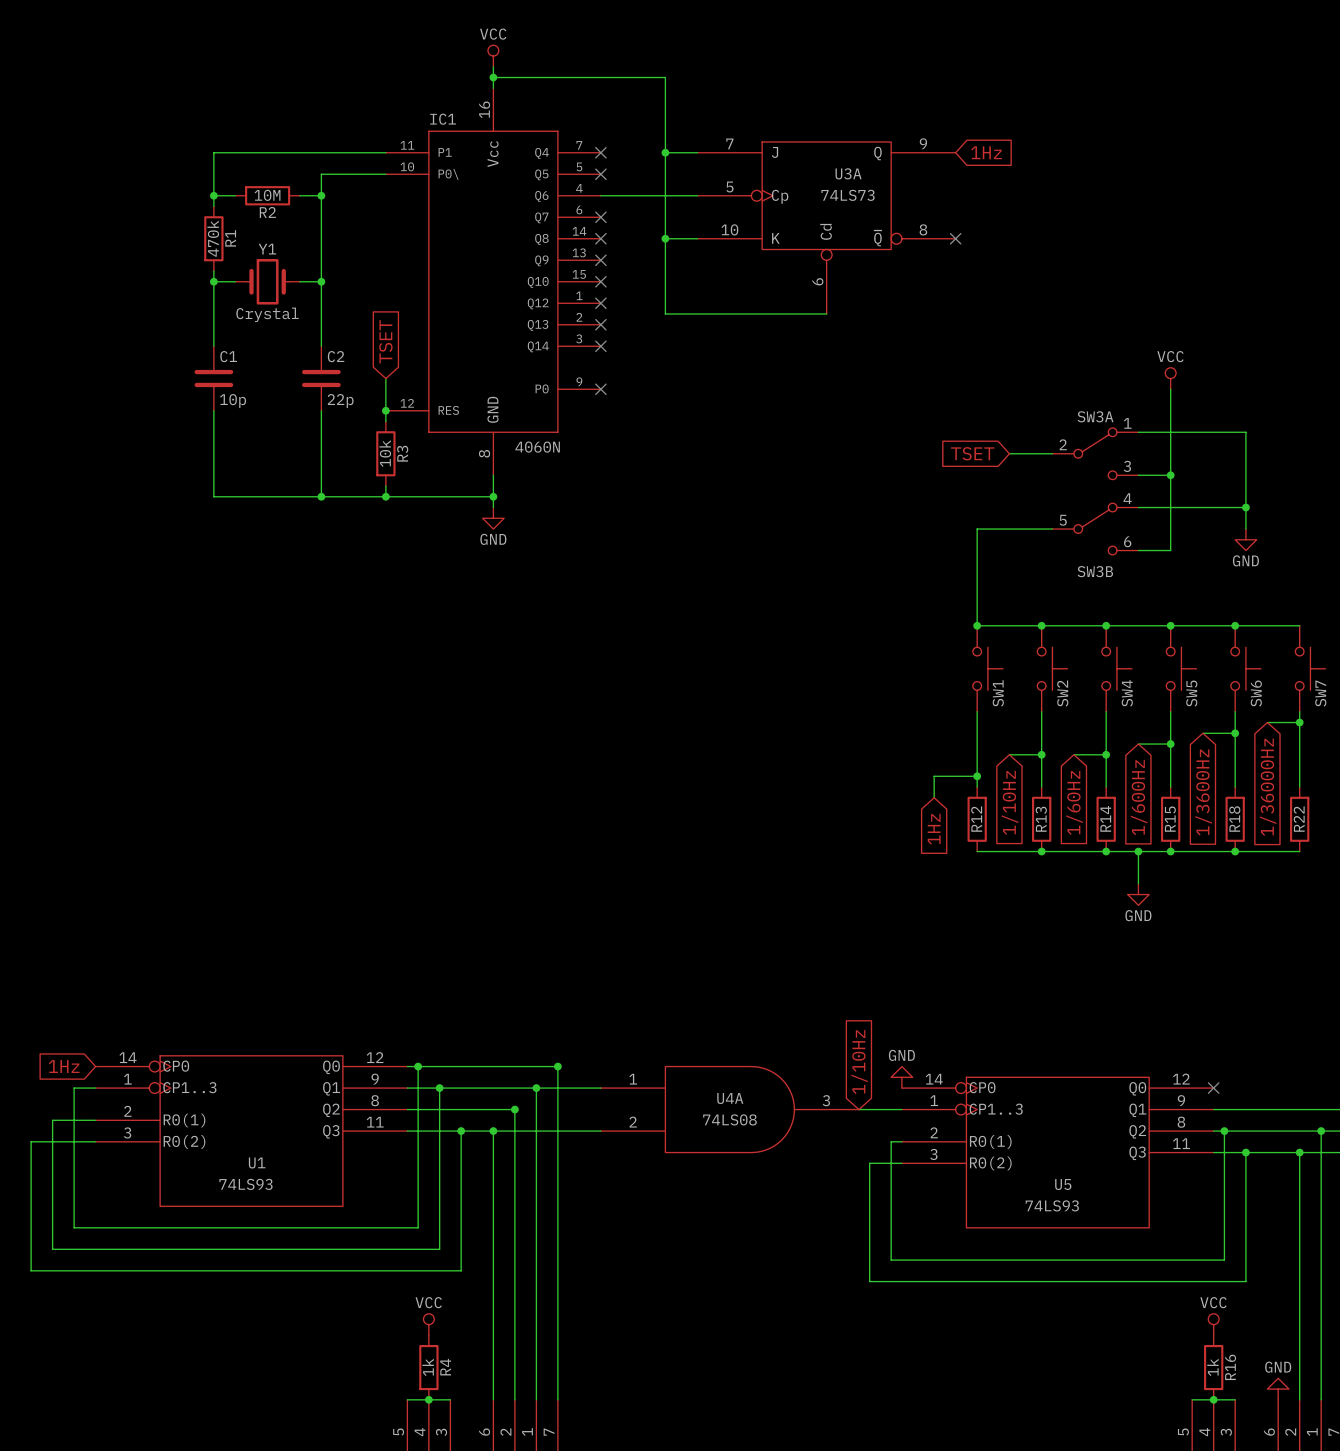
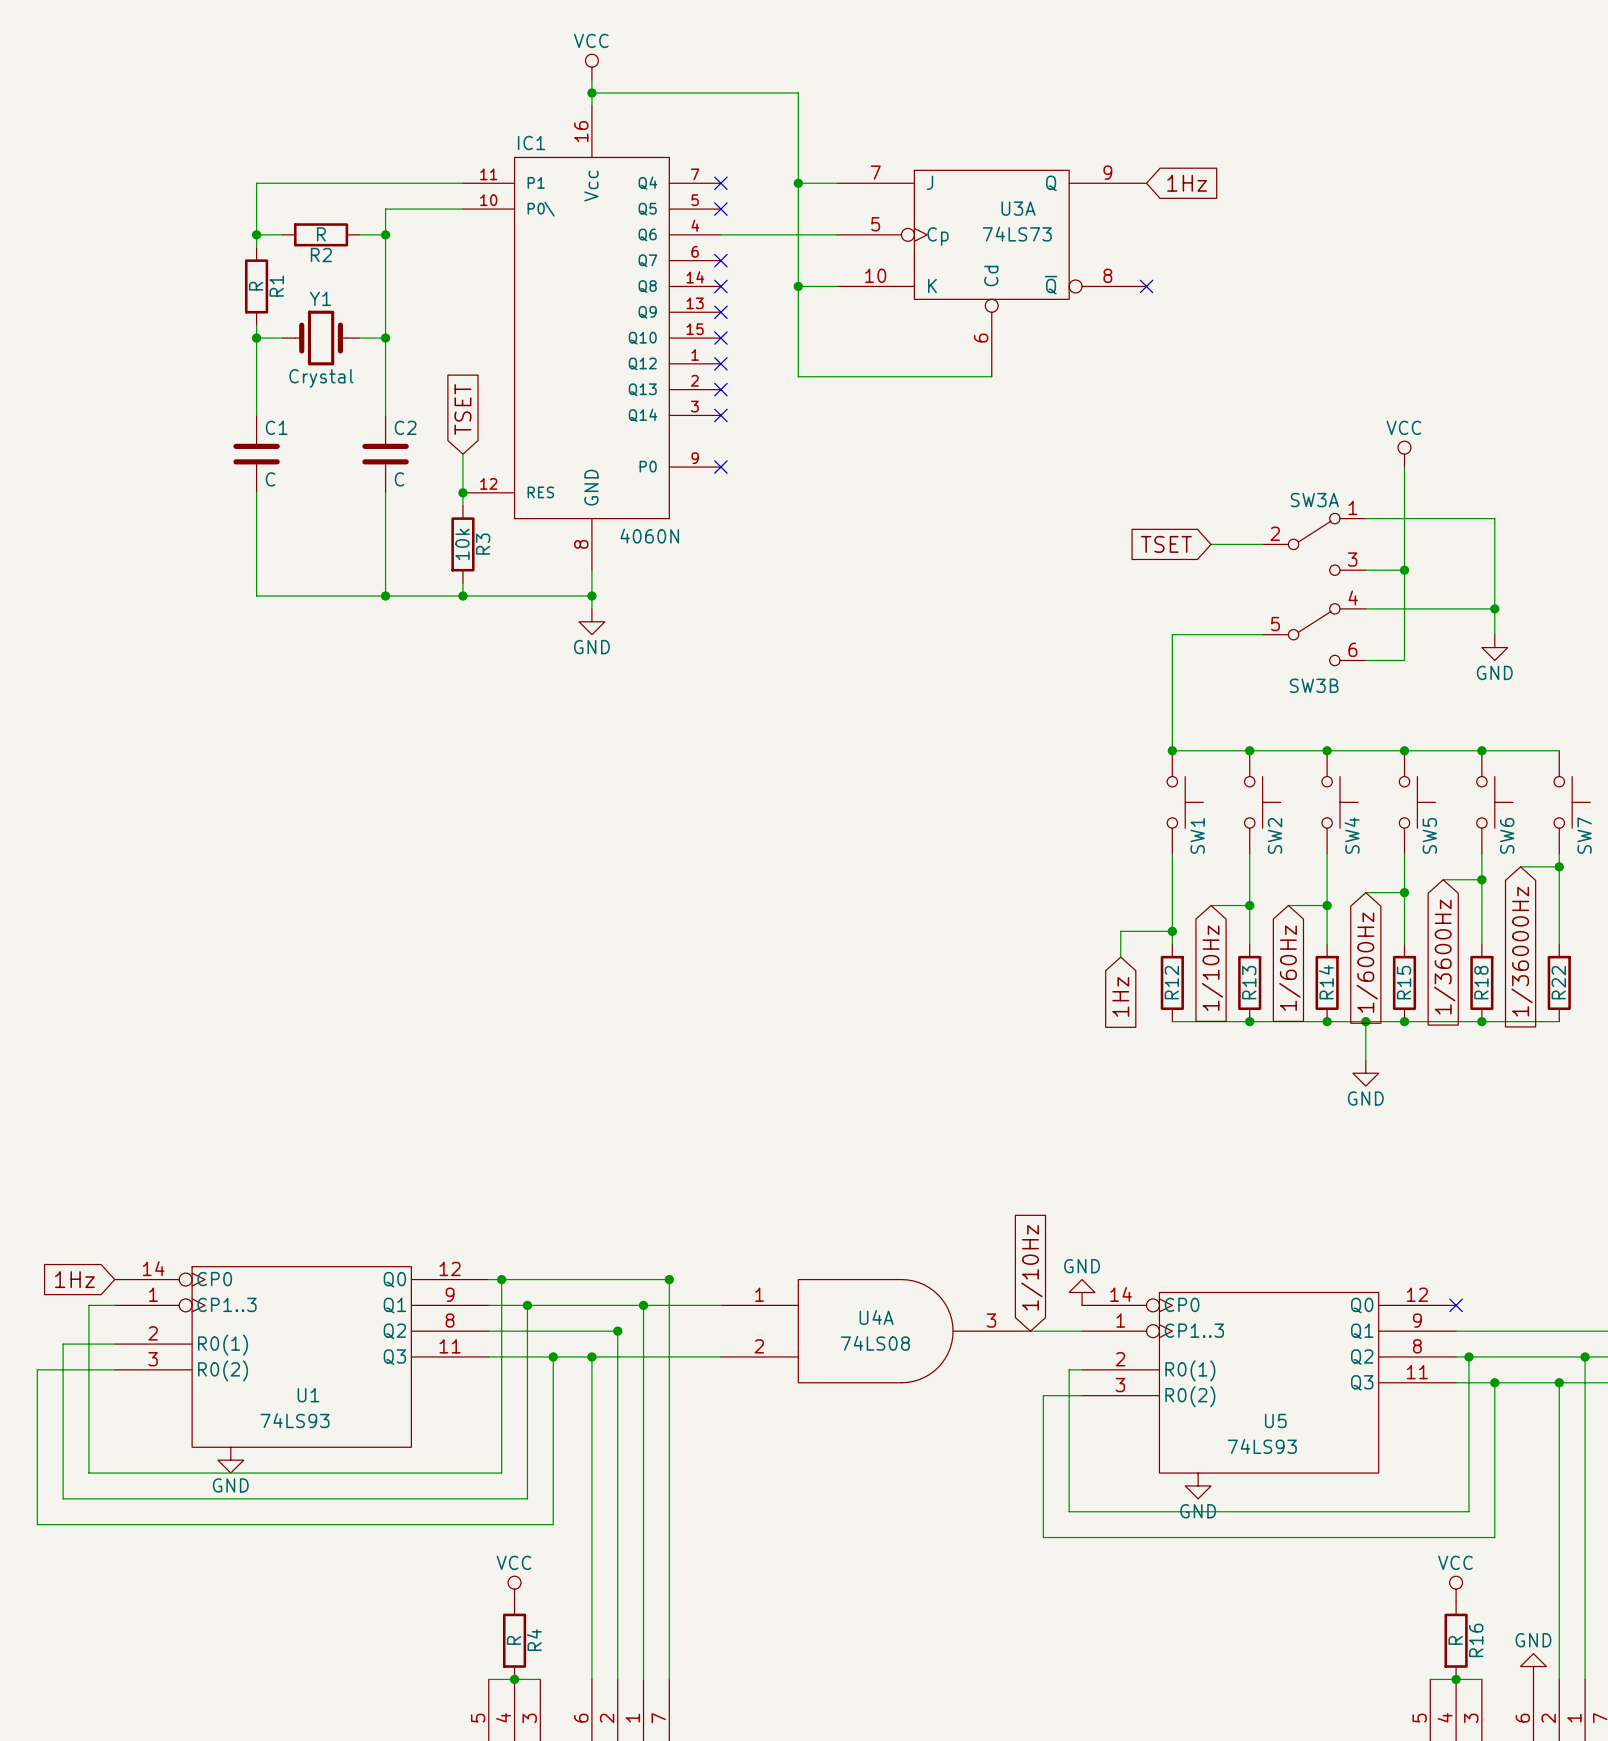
R2 value: 10M (267, 195) -> R (321, 234)
R1 value: 470k (213, 238) -> R (256, 286)
C1 value: 10p (233, 401) -> C (270, 479)
C2 value: 22p (340, 401) -> C (399, 479)
power symbol: none -> GND (230, 1460)
power symbol: none -> GND (1198, 1485)
R4 value: 1k (428, 1367) -> R (514, 1640)
R16 value: 1k (1212, 1367) -> R (1455, 1640)

